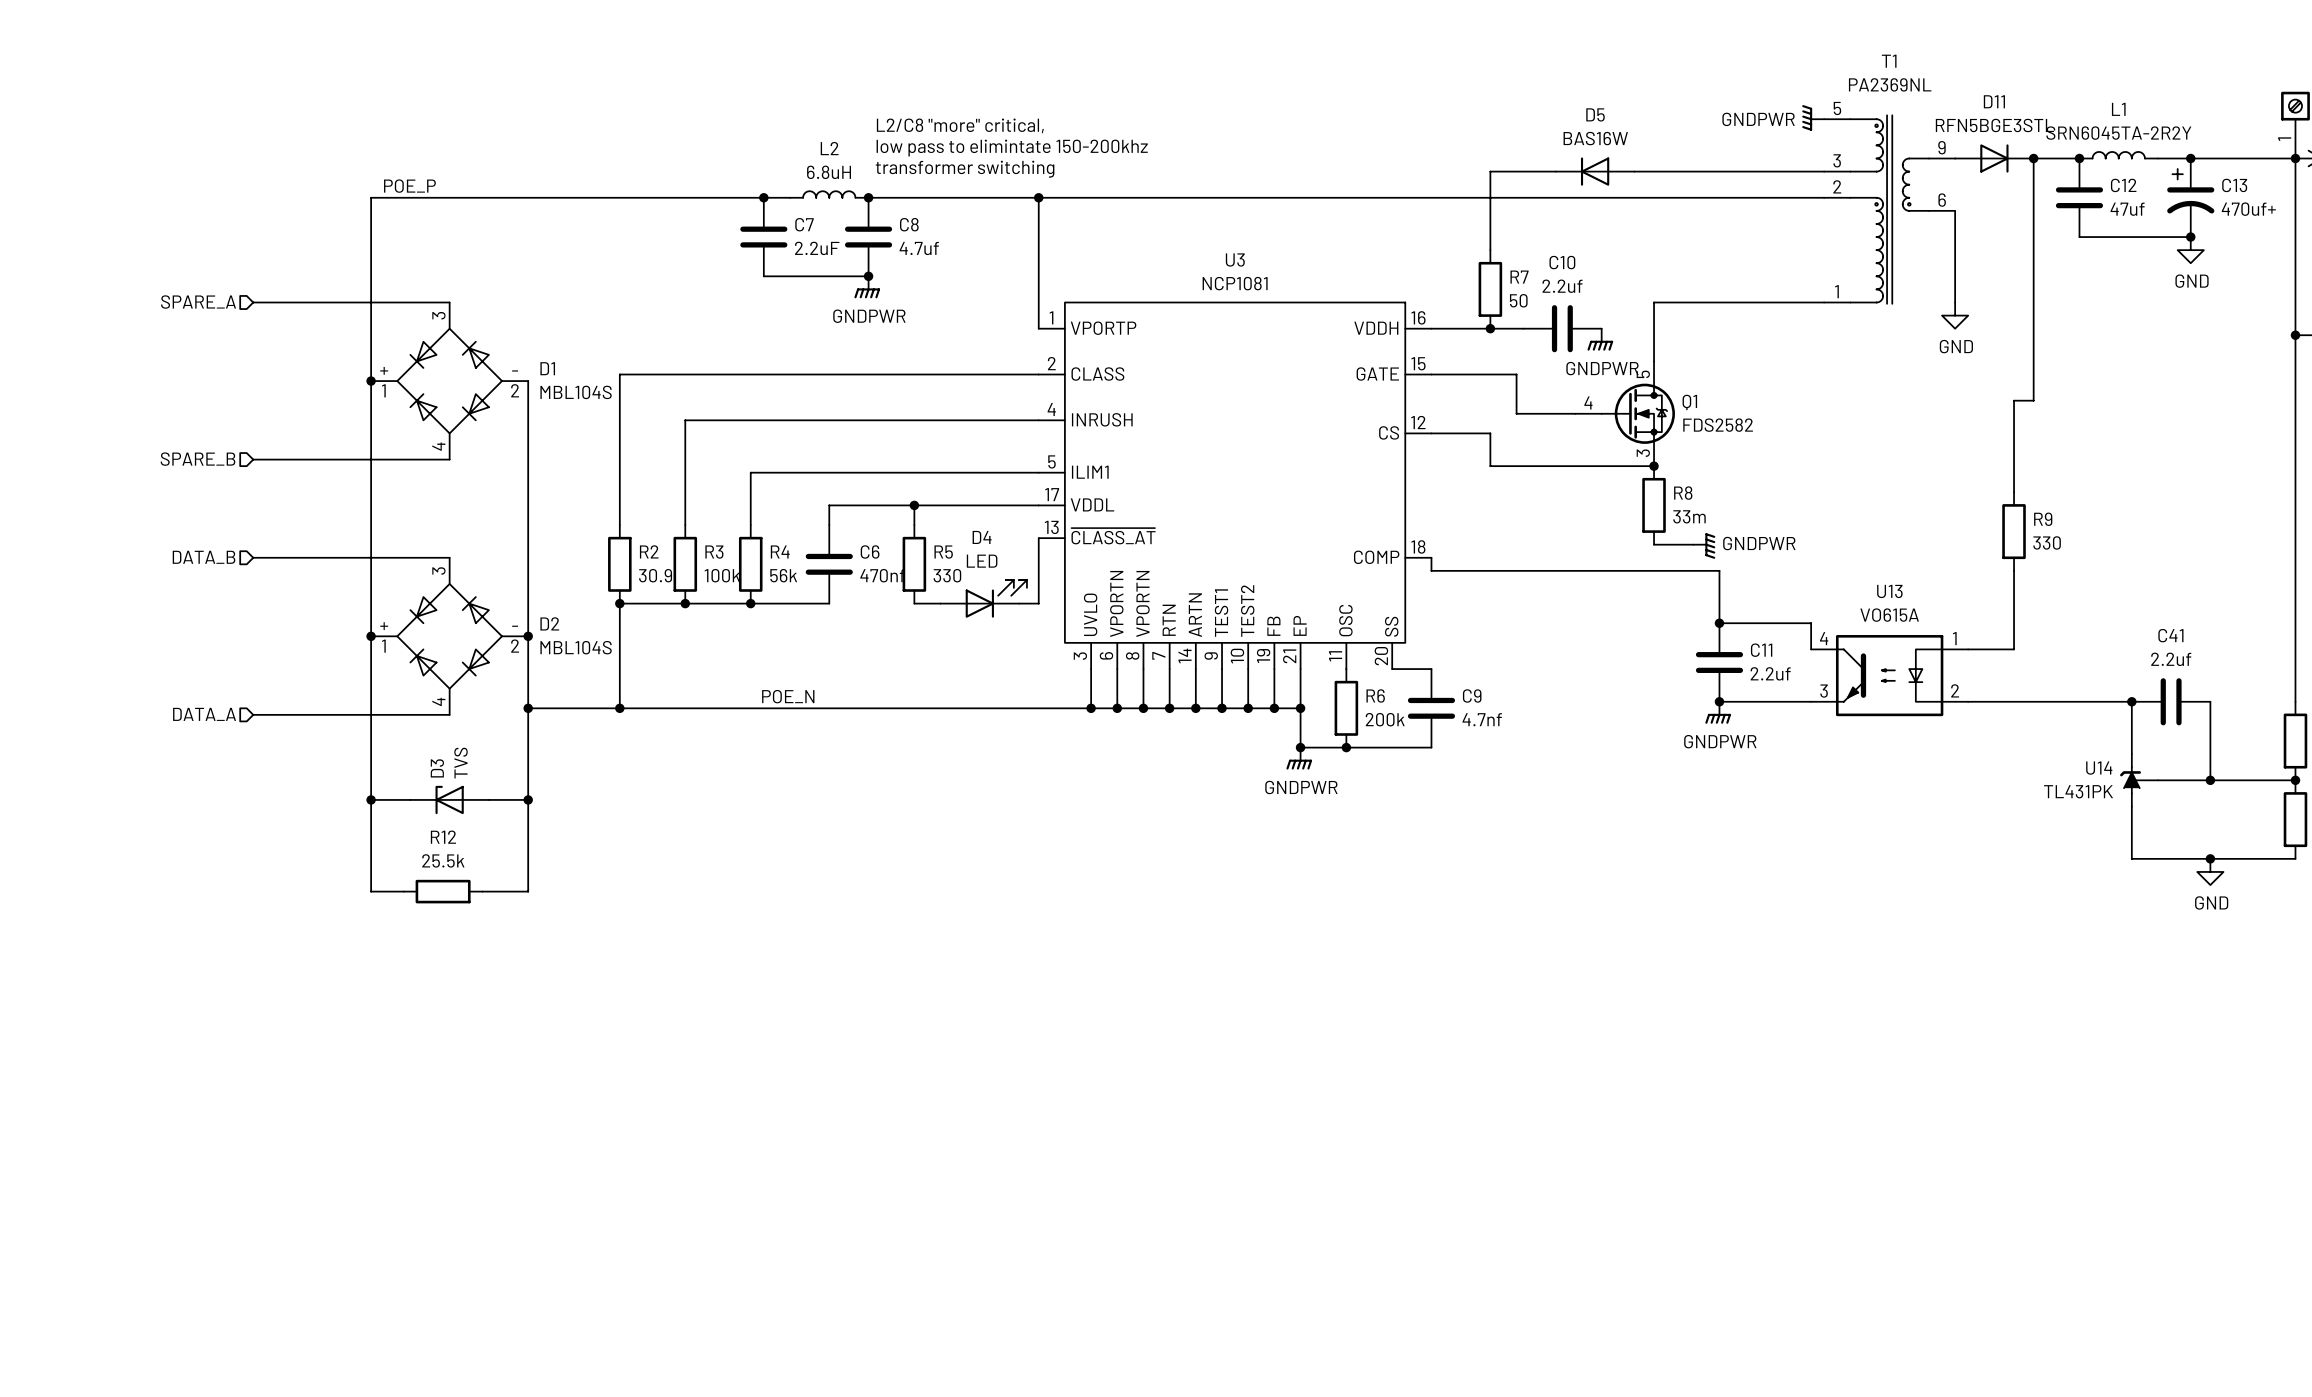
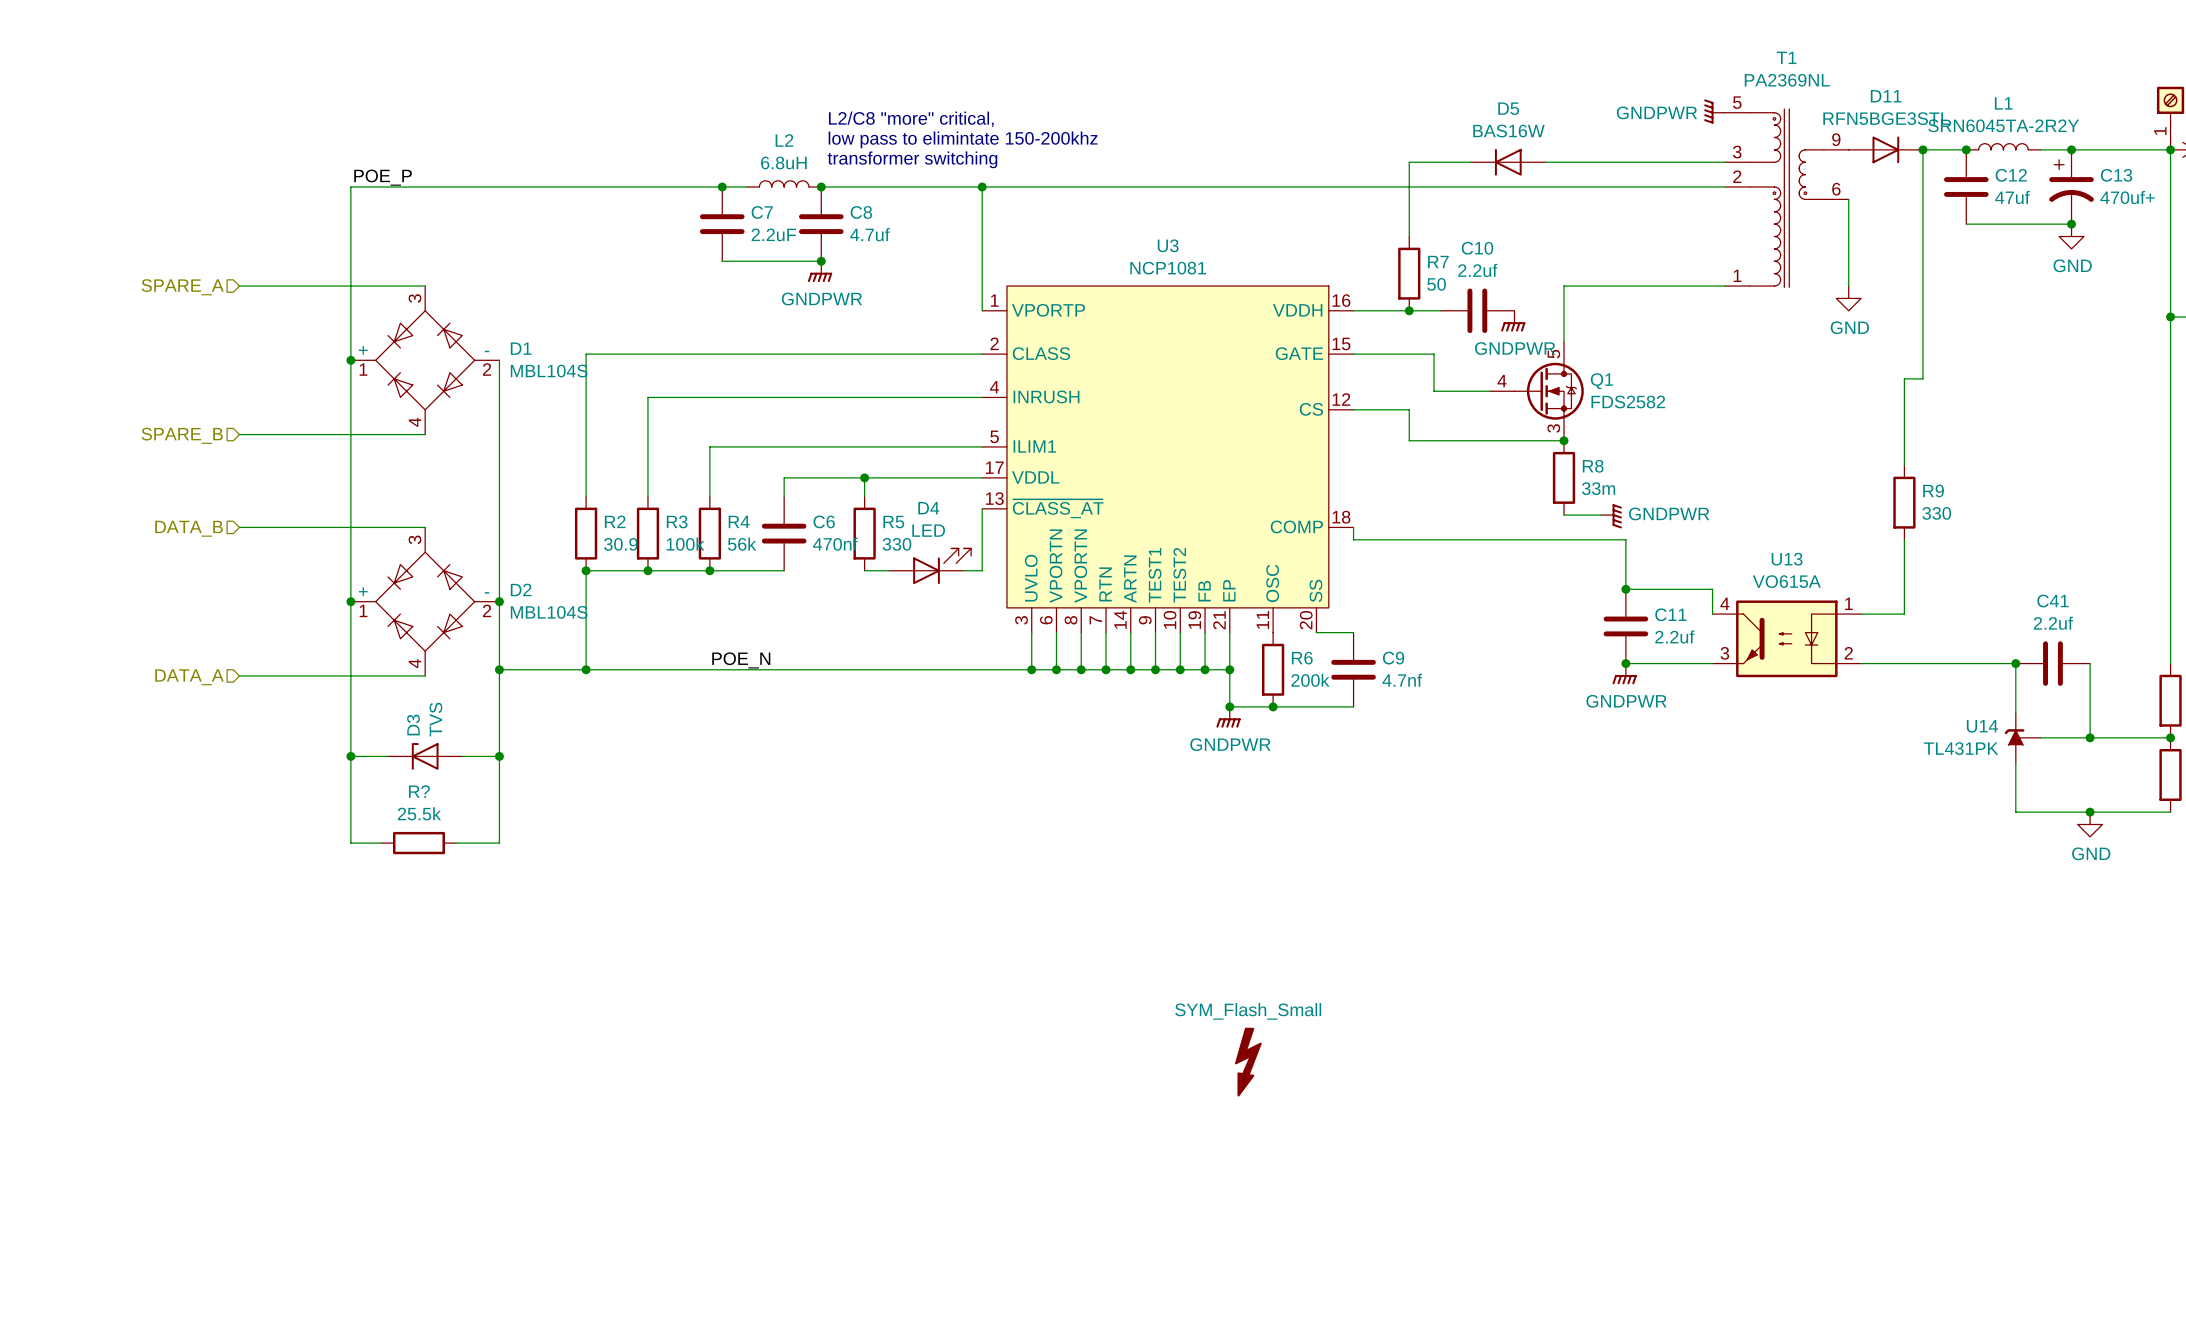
R12 name: R12 (443, 837) -> R? (419, 791)
power symbol: none -> SYM_Flash_Small (1248, 1062)

